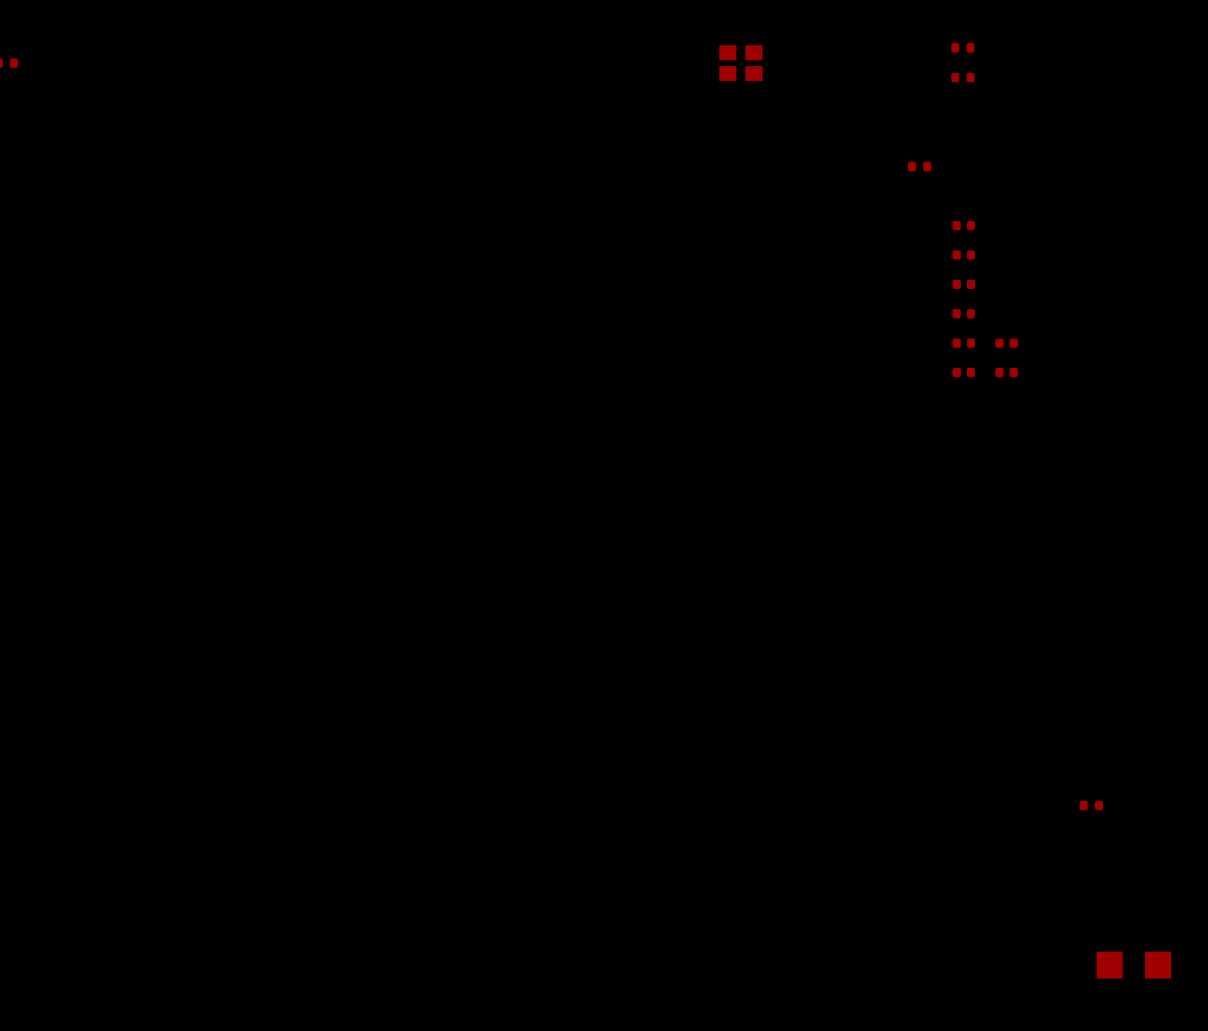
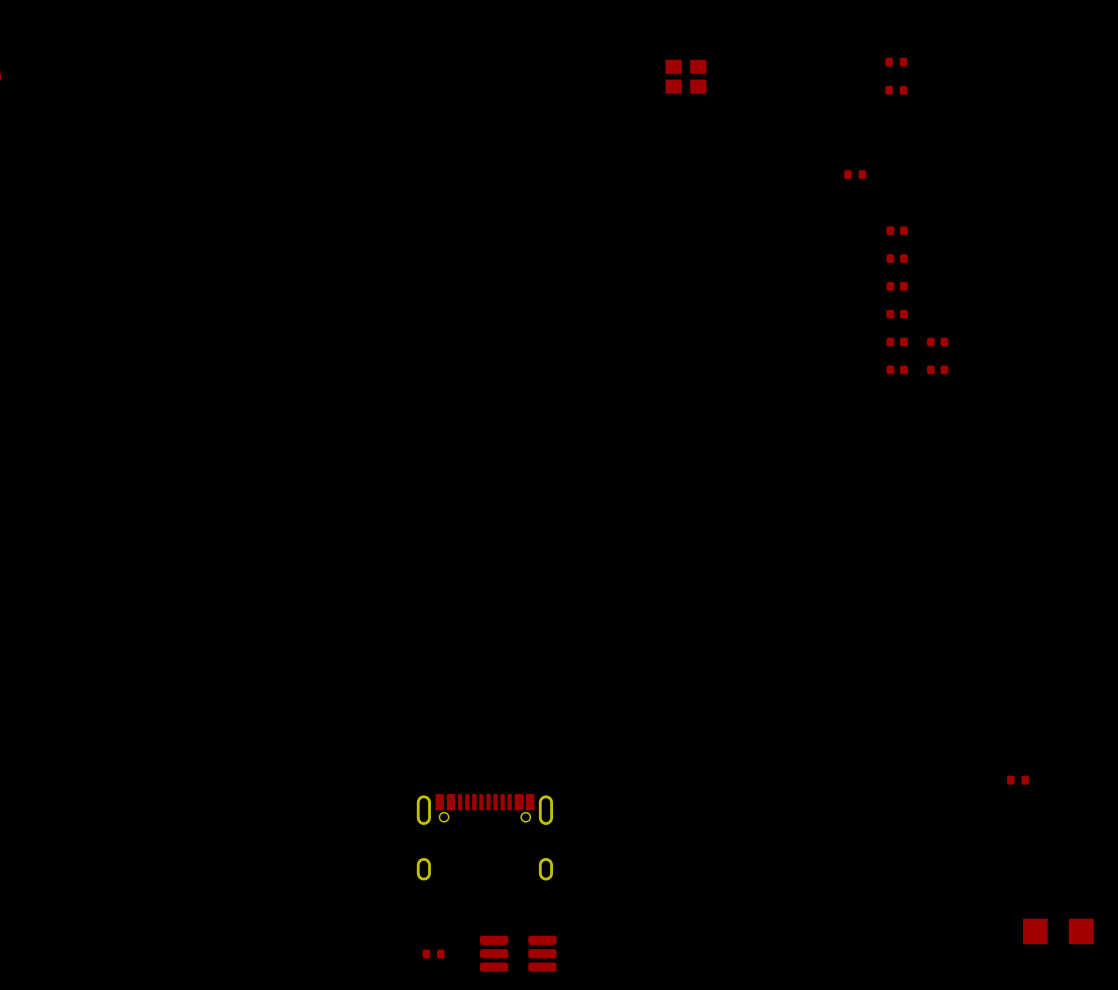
part: none -> (484, 837)
part: none -> (433, 954)
part: none -> (518, 953)

